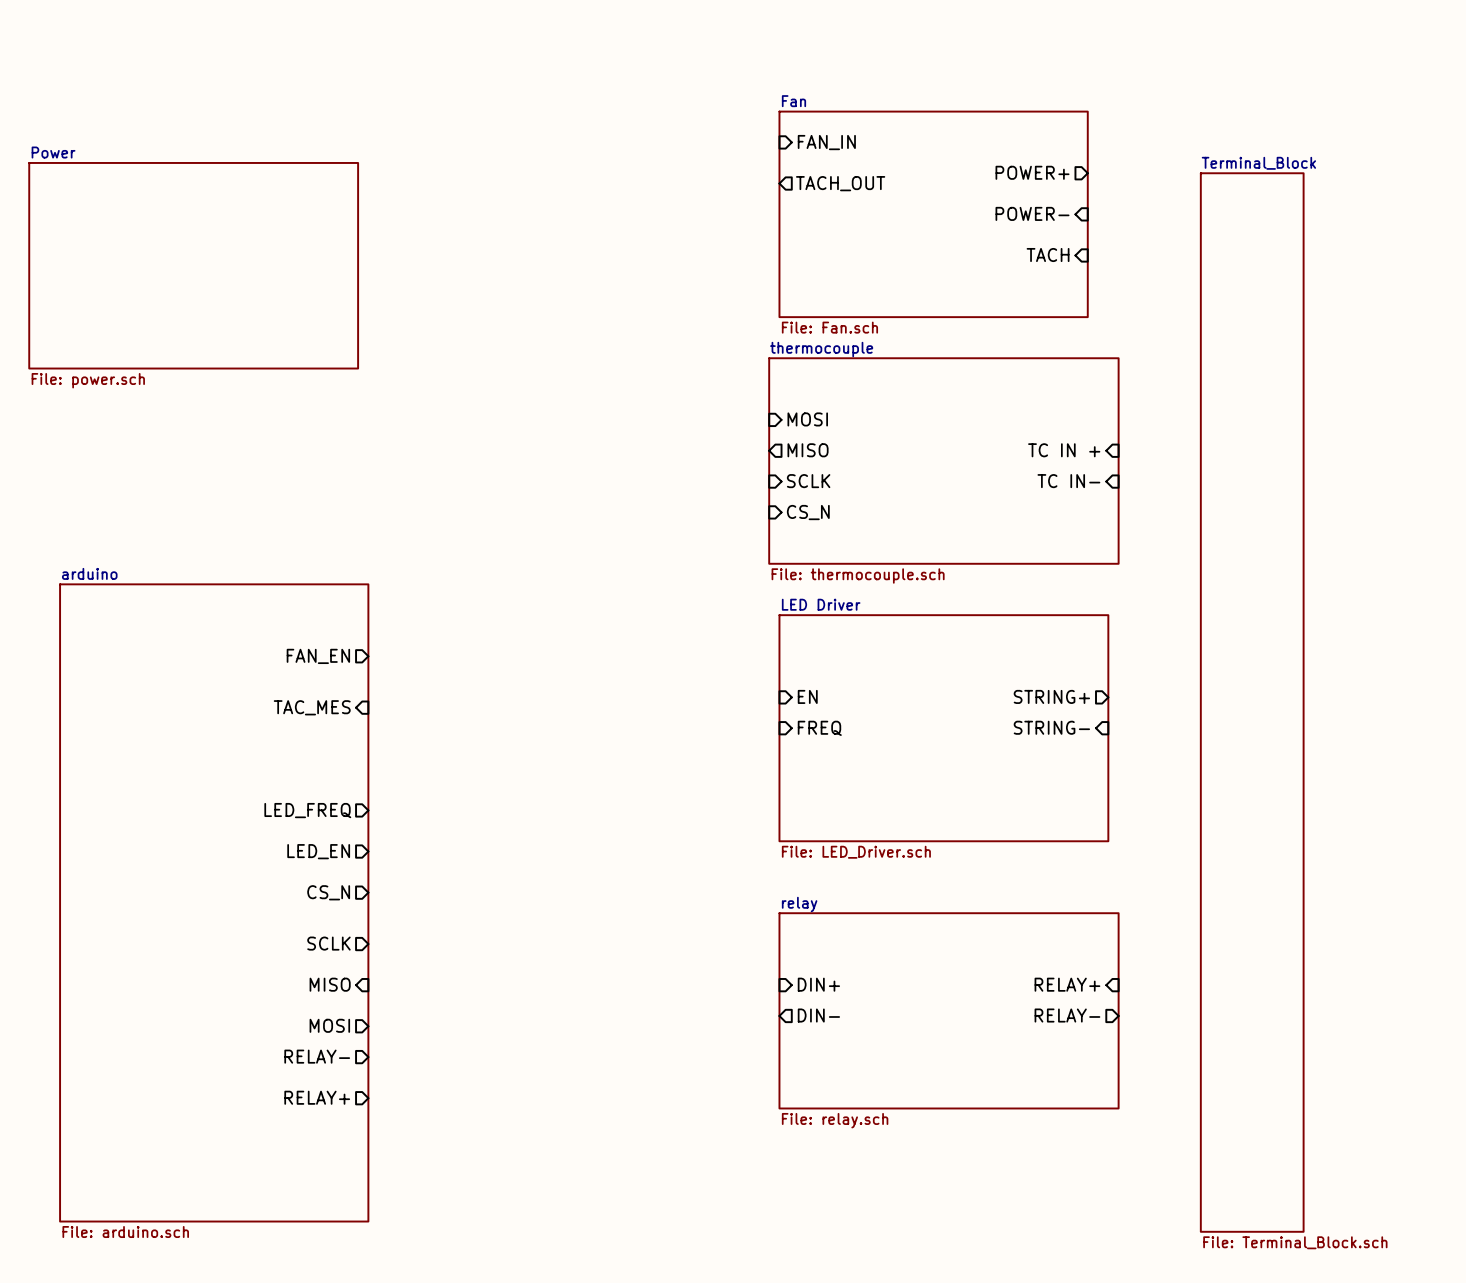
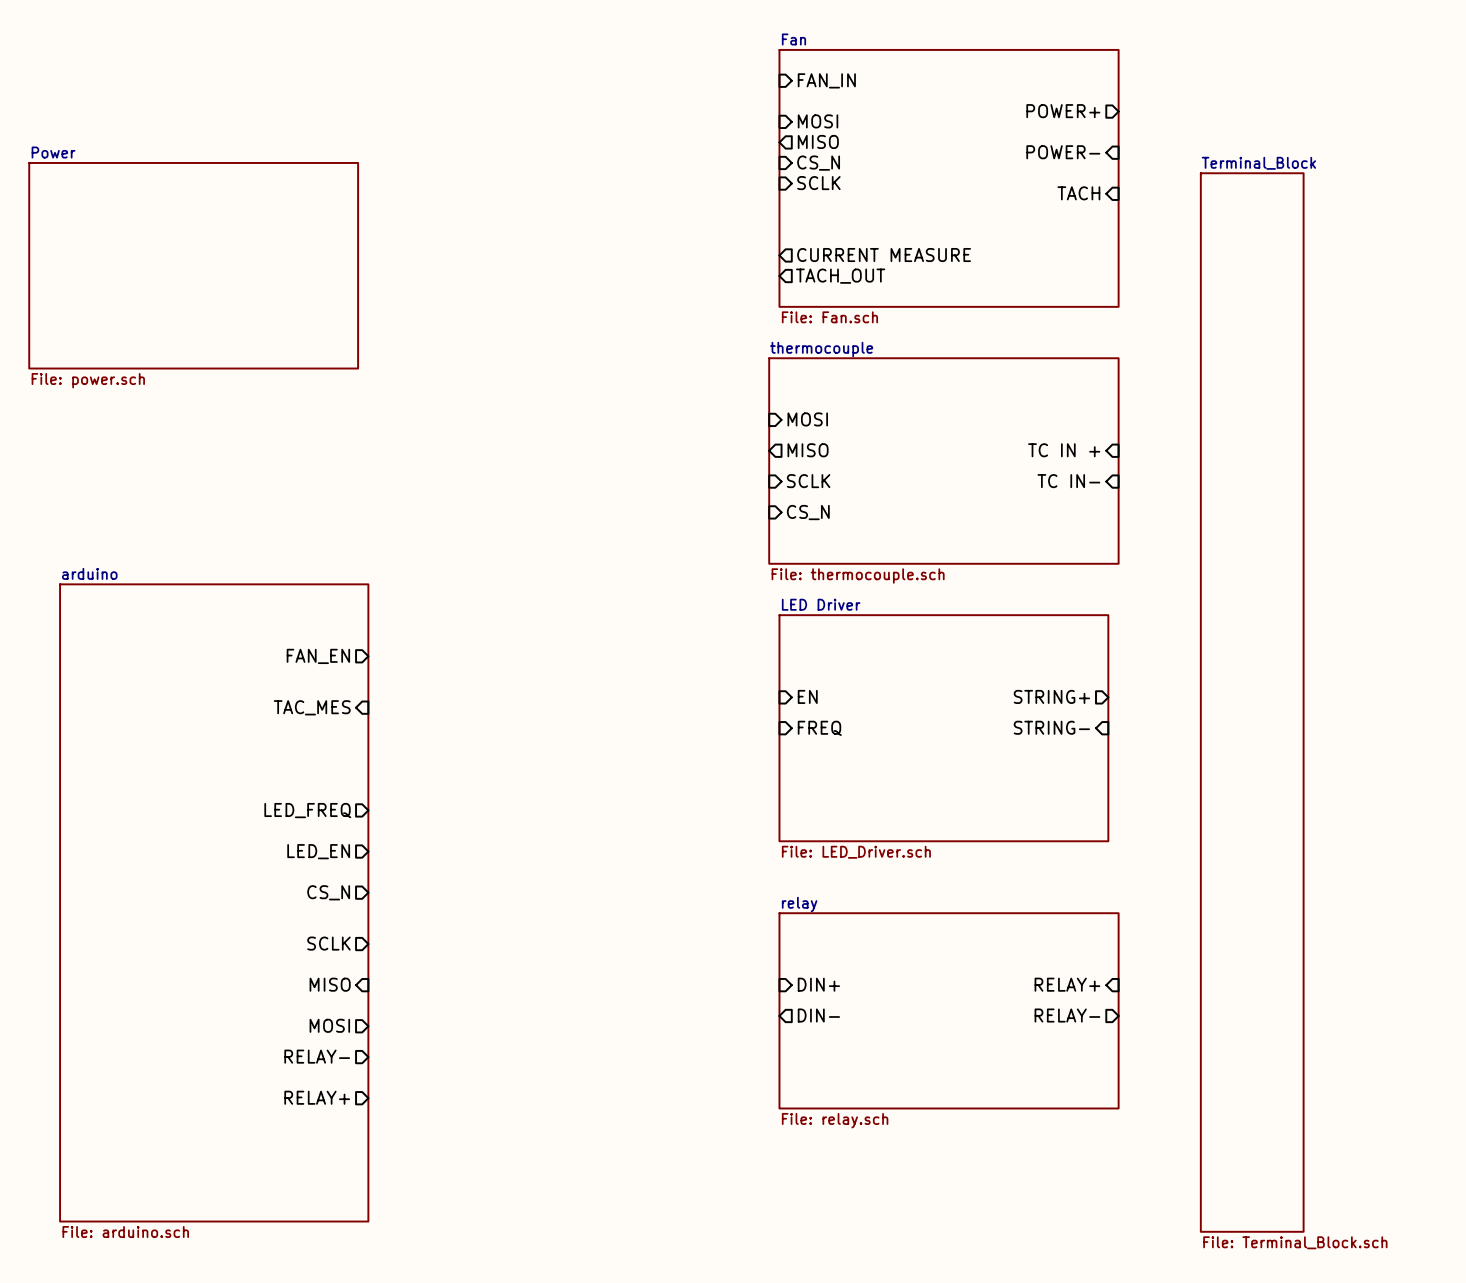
sheet pin: none -> FAN_IN (826, 80)
sheet pin: none -> MOSI (818, 121)
sheet pin shape: input (826, 142) -> output (818, 141)
sheet pin: FAN_IN (826, 142) -> MISO (818, 141)
sheet pin: none -> CS_N (818, 163)
sheet pin position: POWER+ (1032, 172) -> POWER+ (1063, 111)
sheet Fan: none -> File: Fan.sch (949, 178)
sheet pin shape: output (840, 183) -> input (818, 183)
sheet pin: TACH_OUT (840, 183) -> SCLK (818, 183)
sheet pin position: POWER- (1032, 213) -> POWER- (1063, 152)
sheet Fan: File: Fan.sch (933, 214) -> none
sheet pin: none -> CURRENT MEASURE (884, 255)
sheet pin position: TACH (1048, 255) -> TACH (1078, 193)
sheet pin: none -> TACH_OUT (840, 276)

